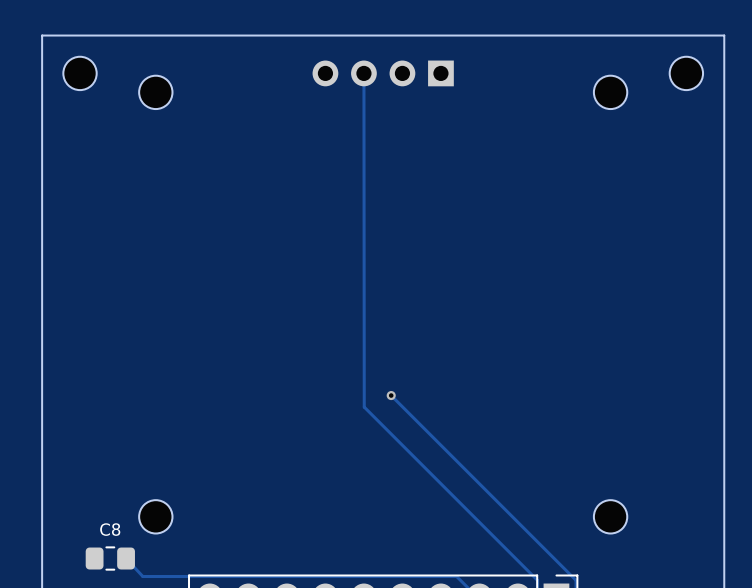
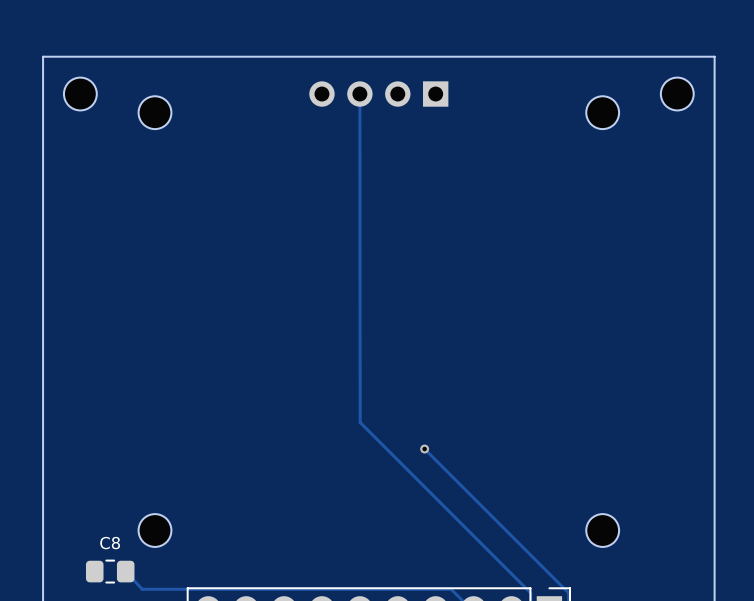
track: (391, 395) (429, 434) -> none
via position: (391, 395) -> (424, 449)

